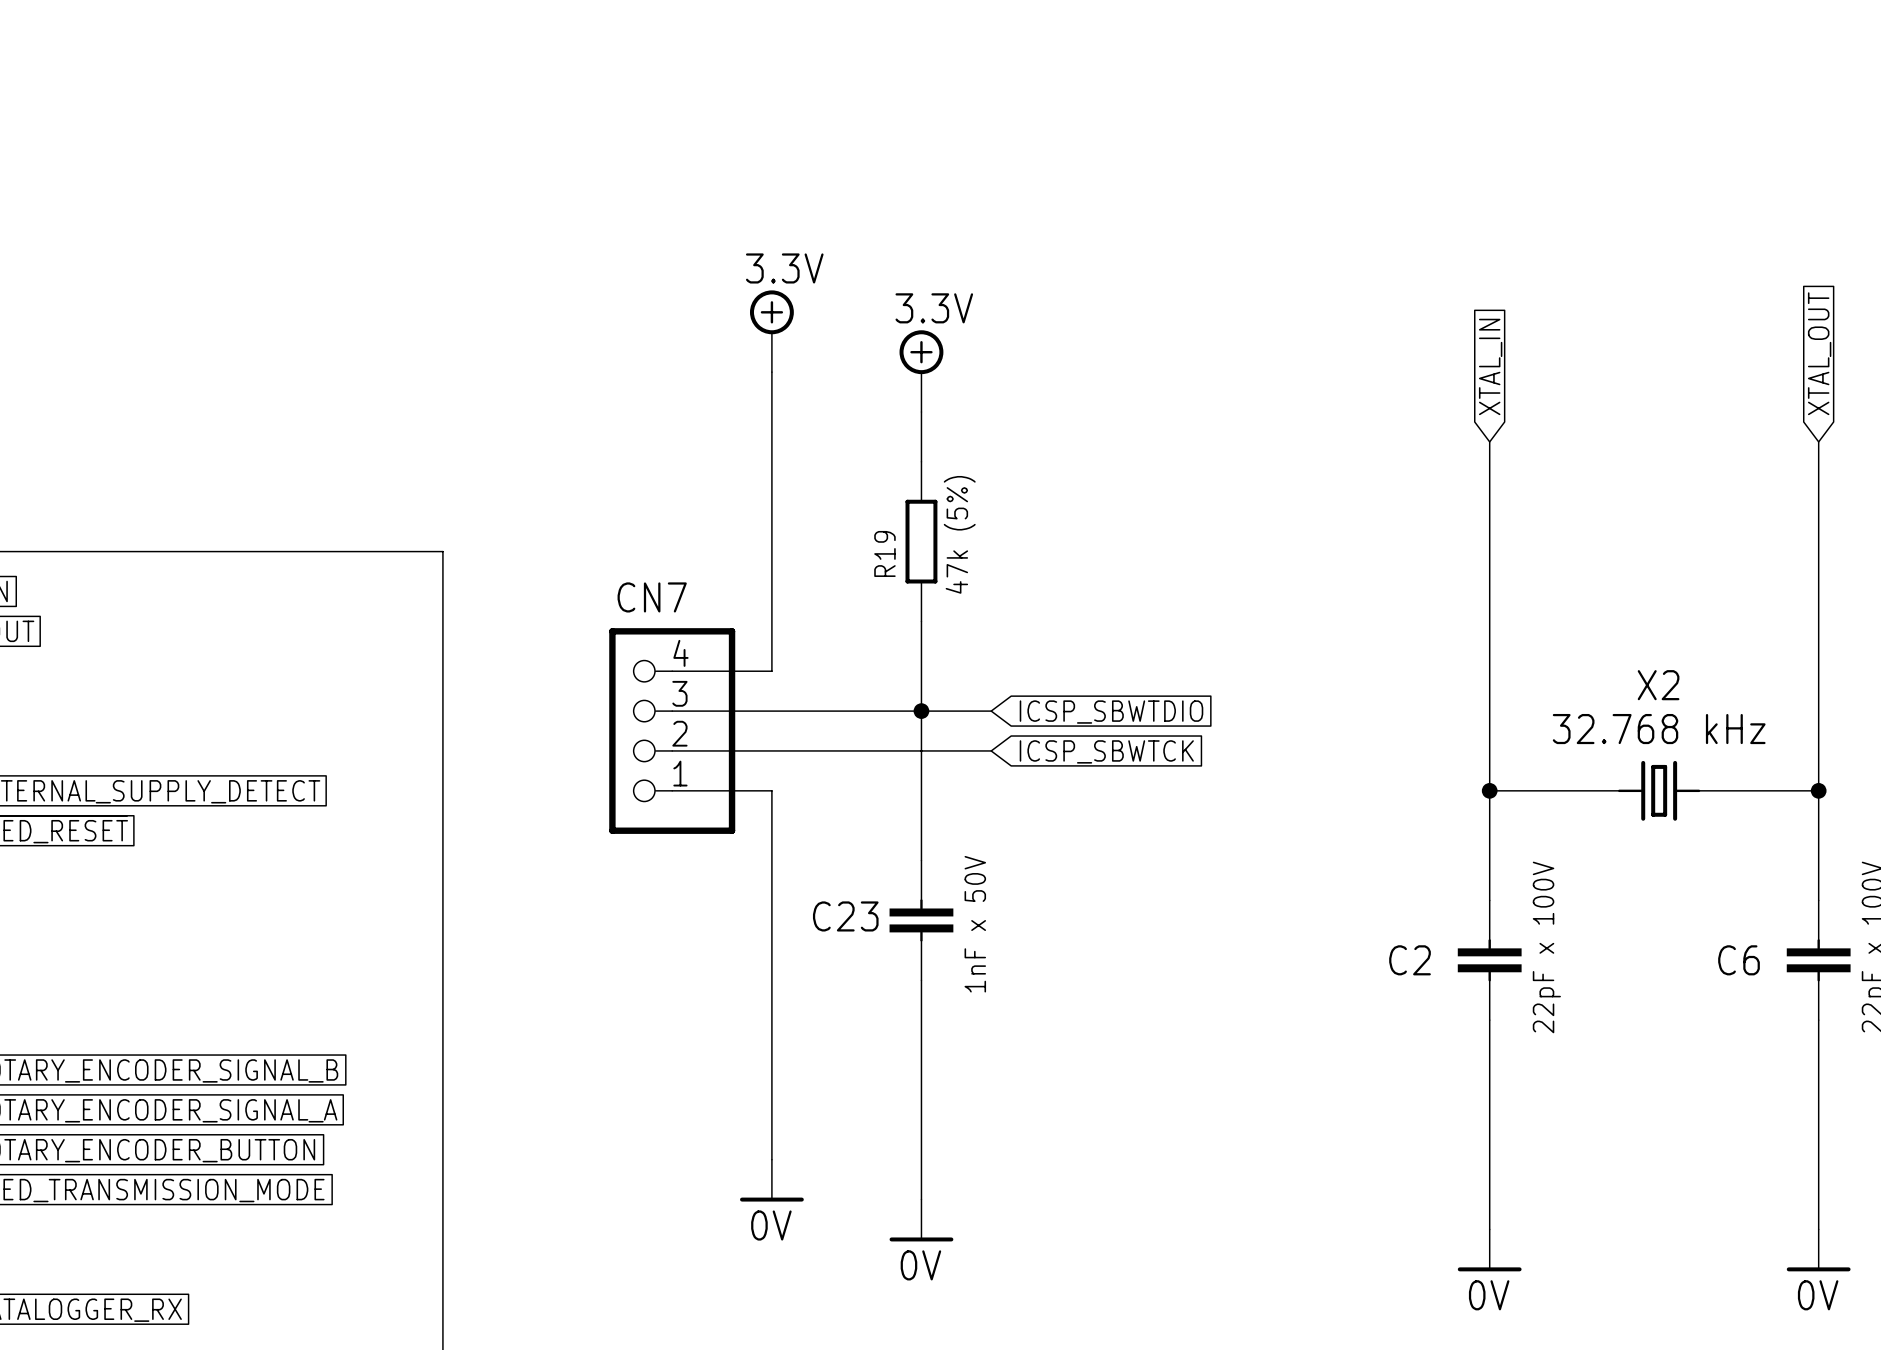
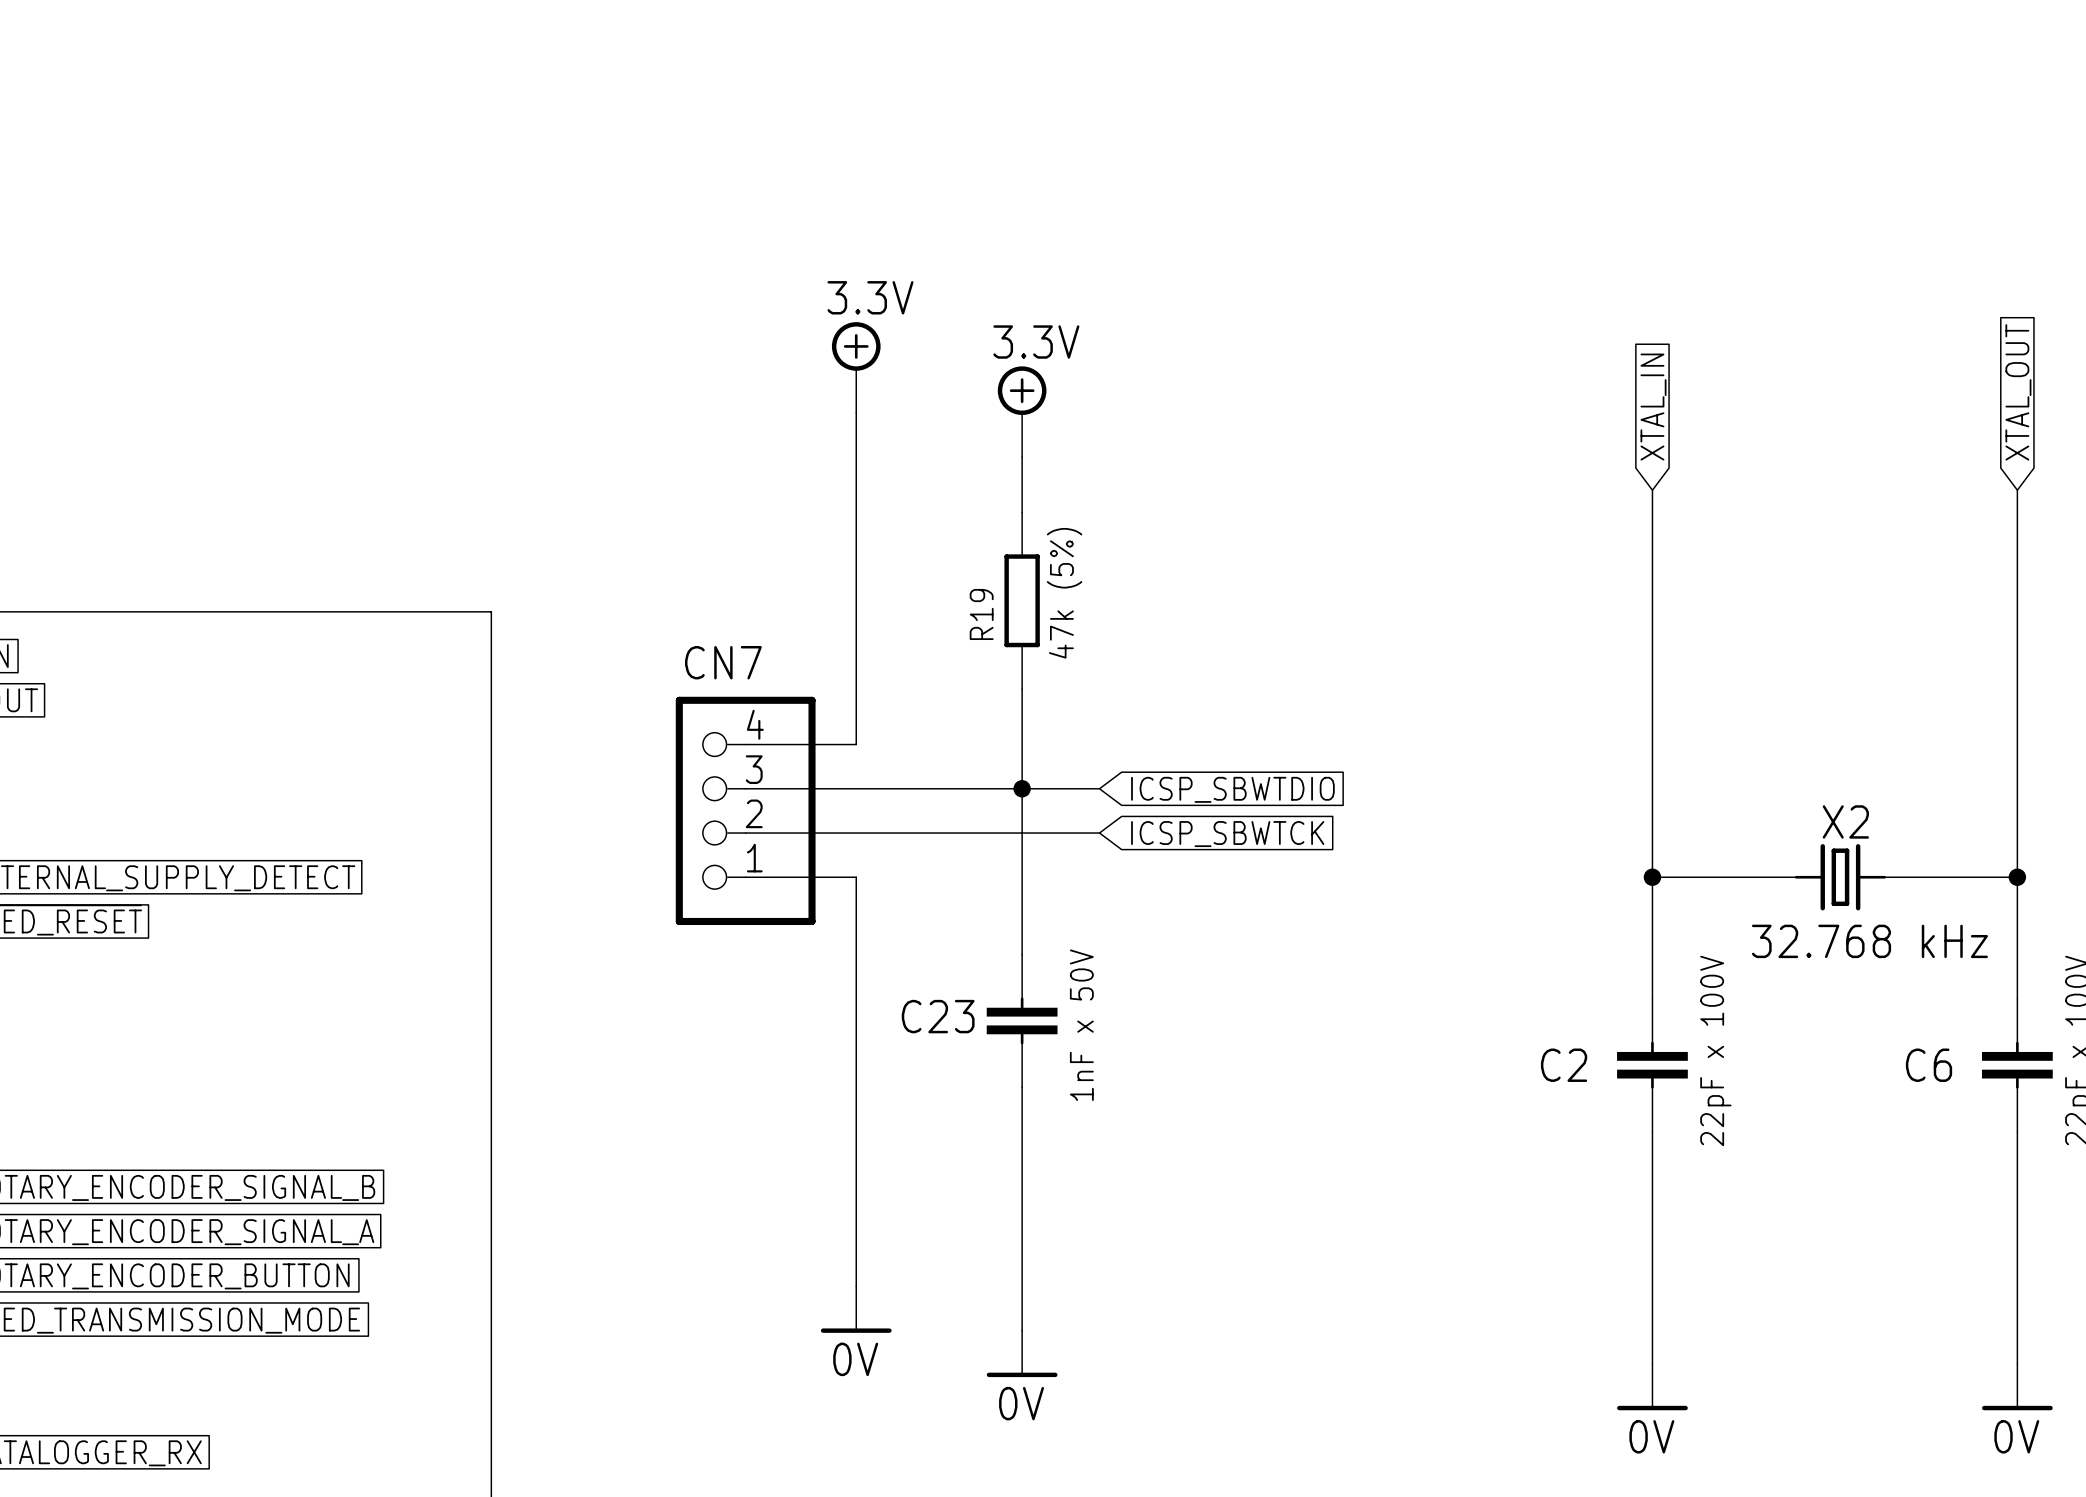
X2 name position: X2 (1658, 685) -> X2 (1845, 821)
X2 value position: 32.768 kHz (1659, 729) -> 32.768 kHz (1869, 941)

